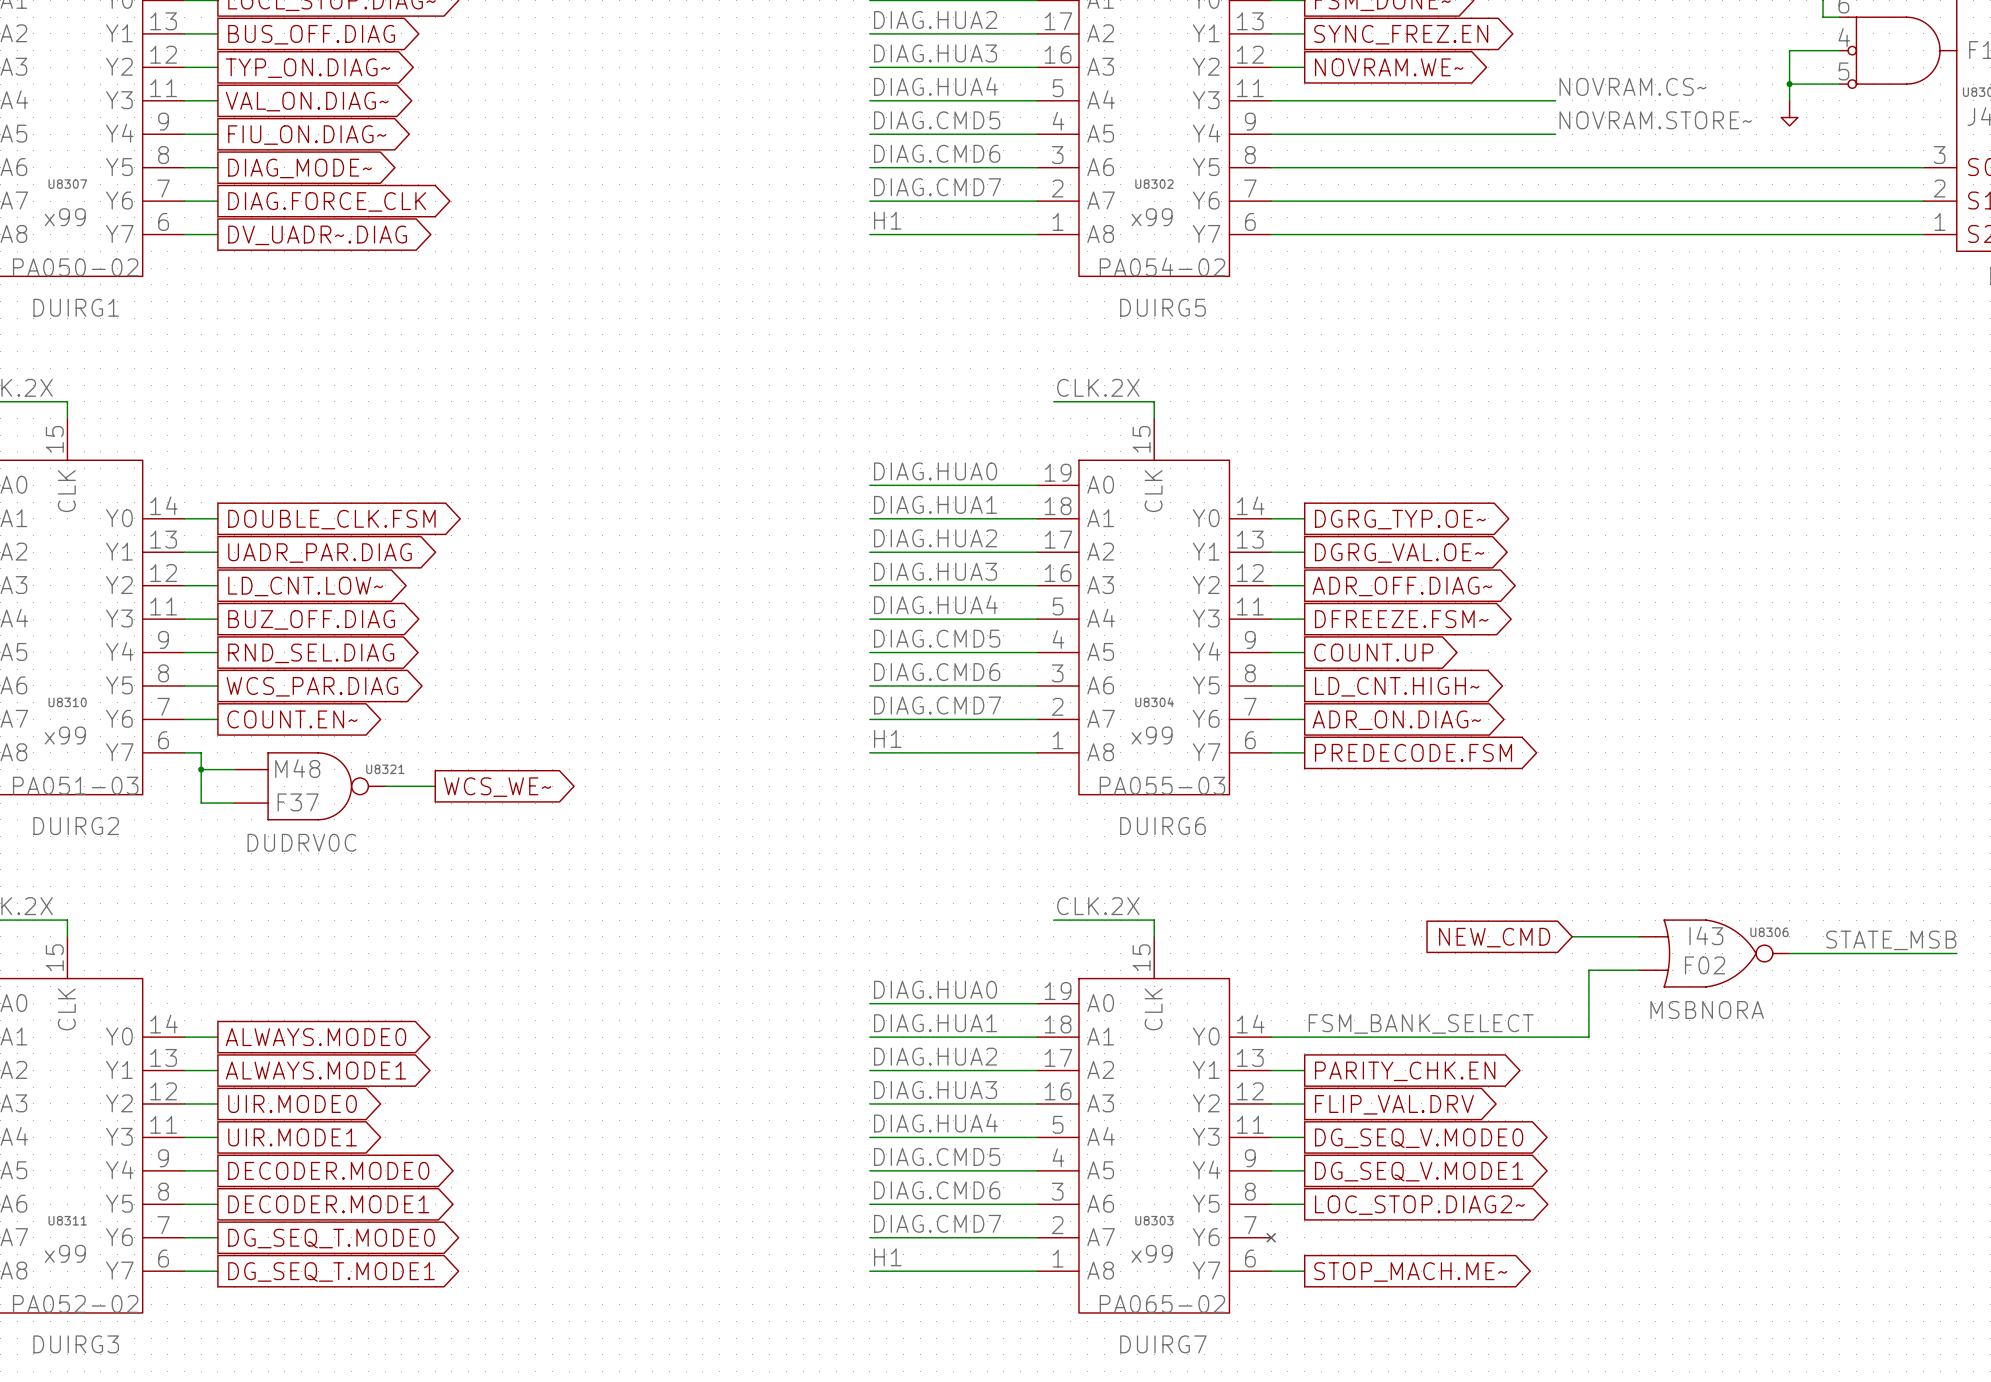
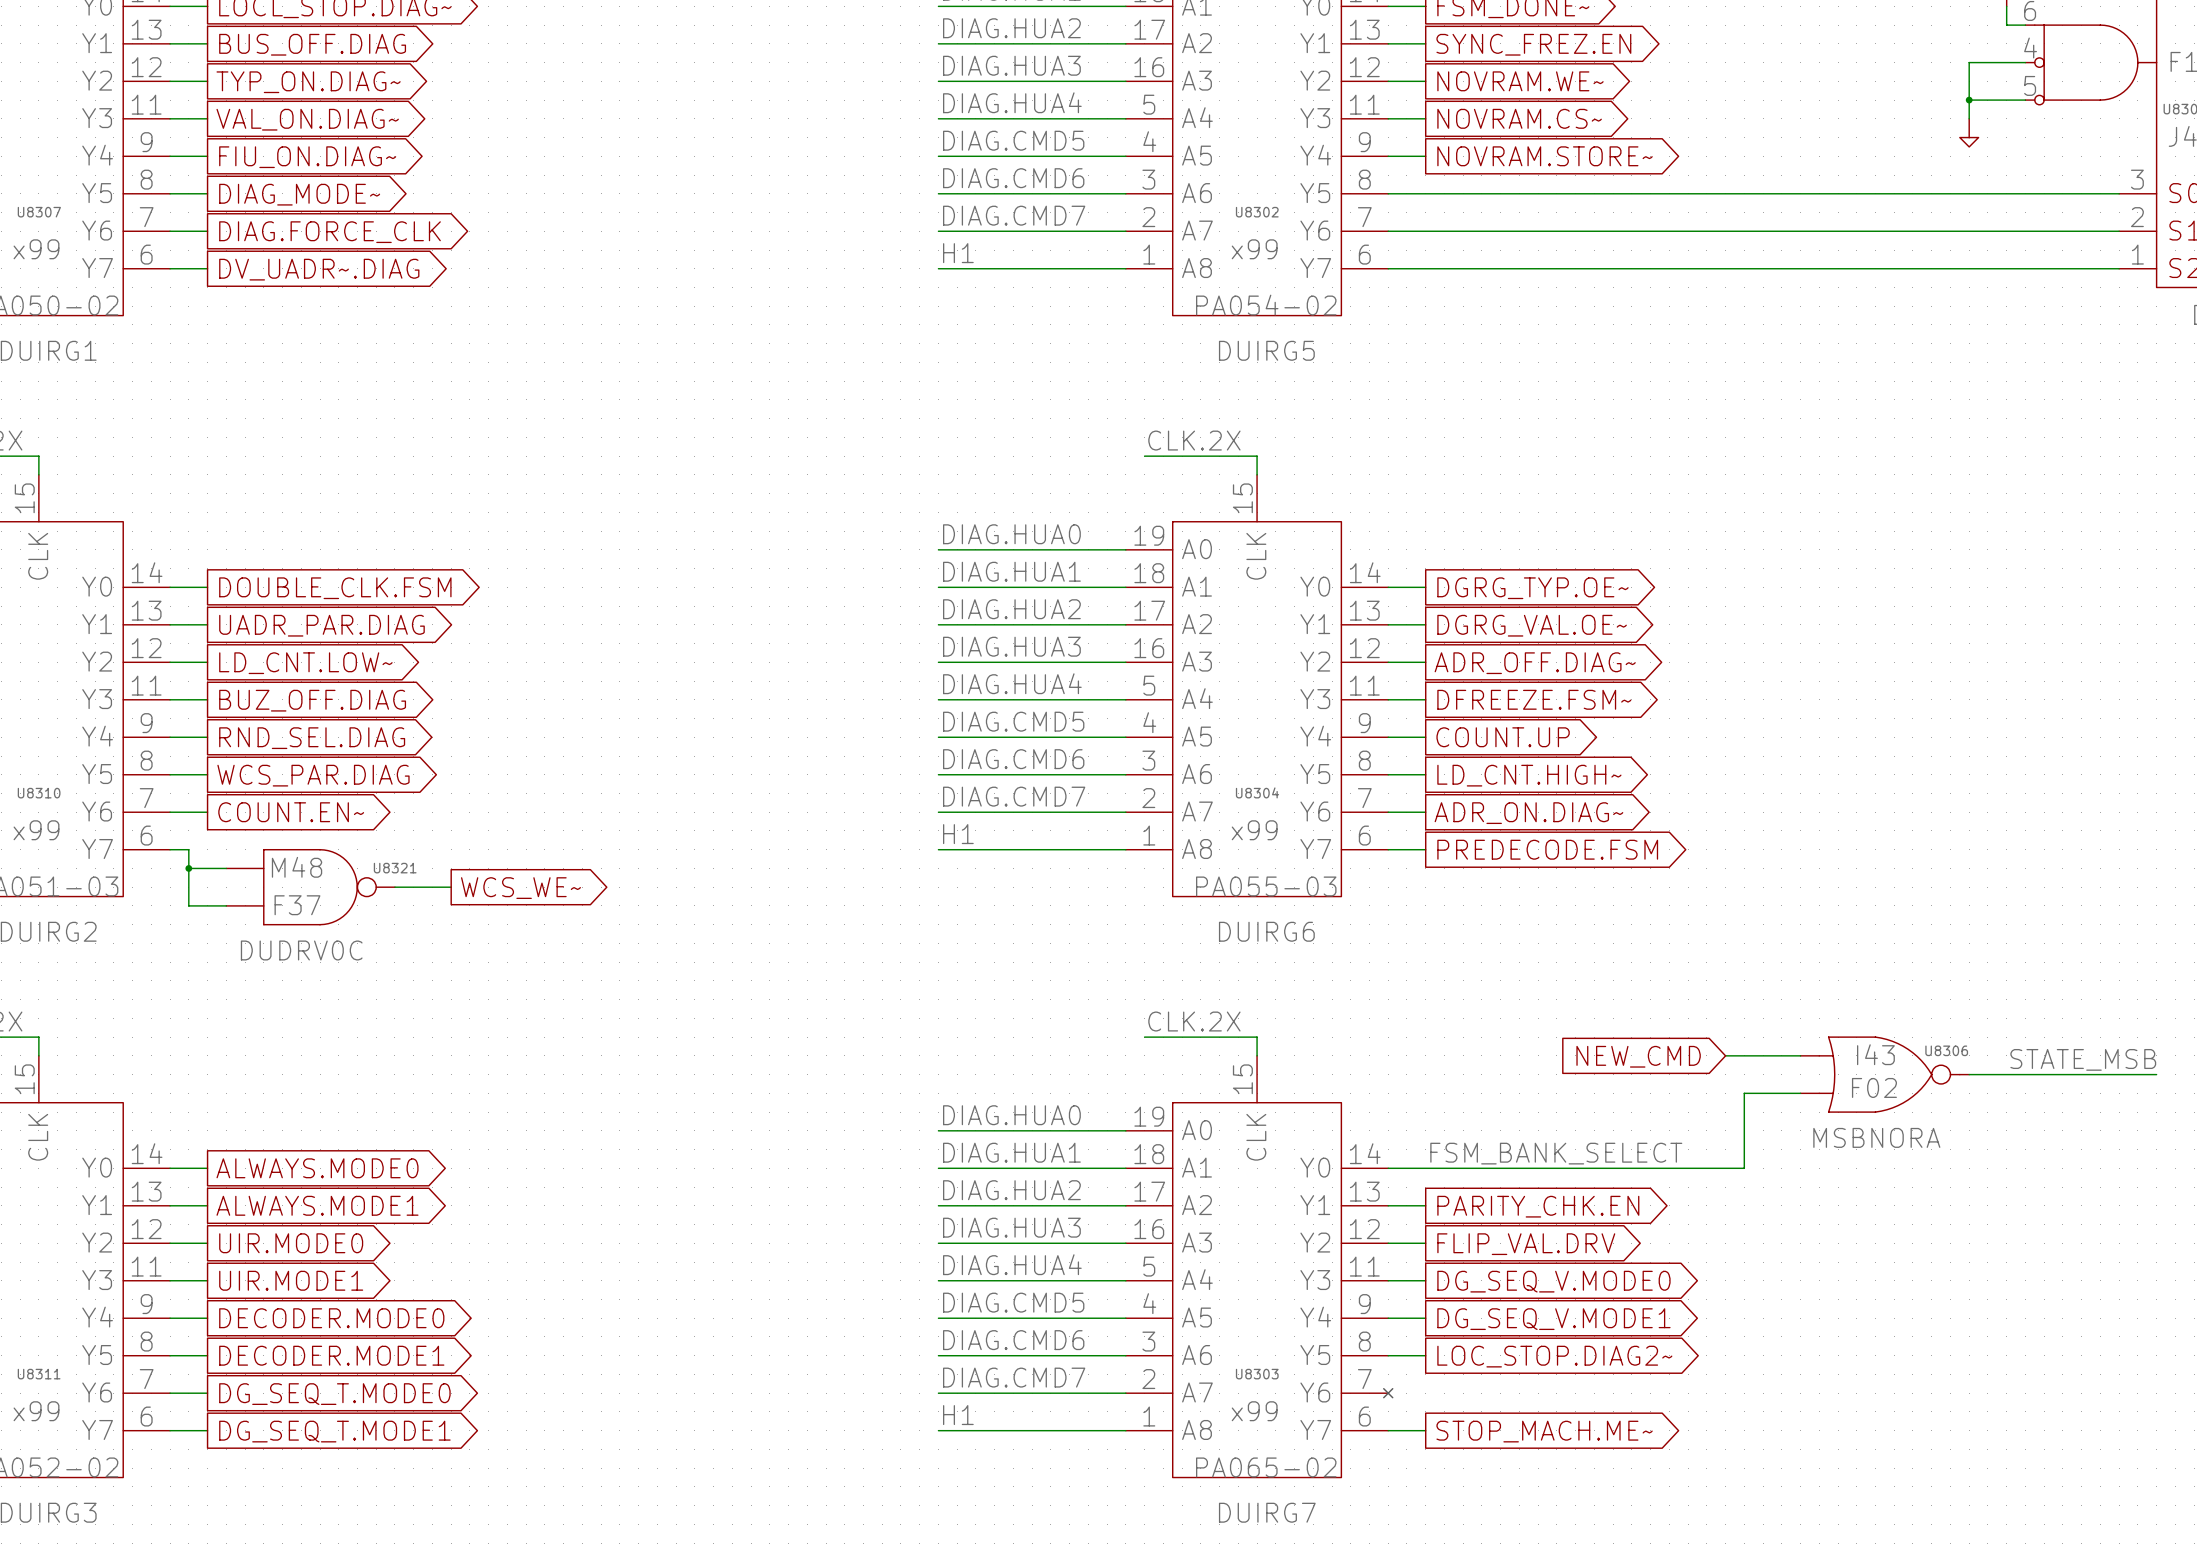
label: NOVRAM.CS~ (1632, 86) -> none
wire: (1304, 100) (1555, 100) -> none
global label: none -> NOVRAM.CS~ (1519, 118)
label: NOVRAM.STORE~ (1655, 120) -> none
wire: (1304, 134) (1555, 134) -> none
global label: none -> NOVRAM.STORE~ (1545, 156)

